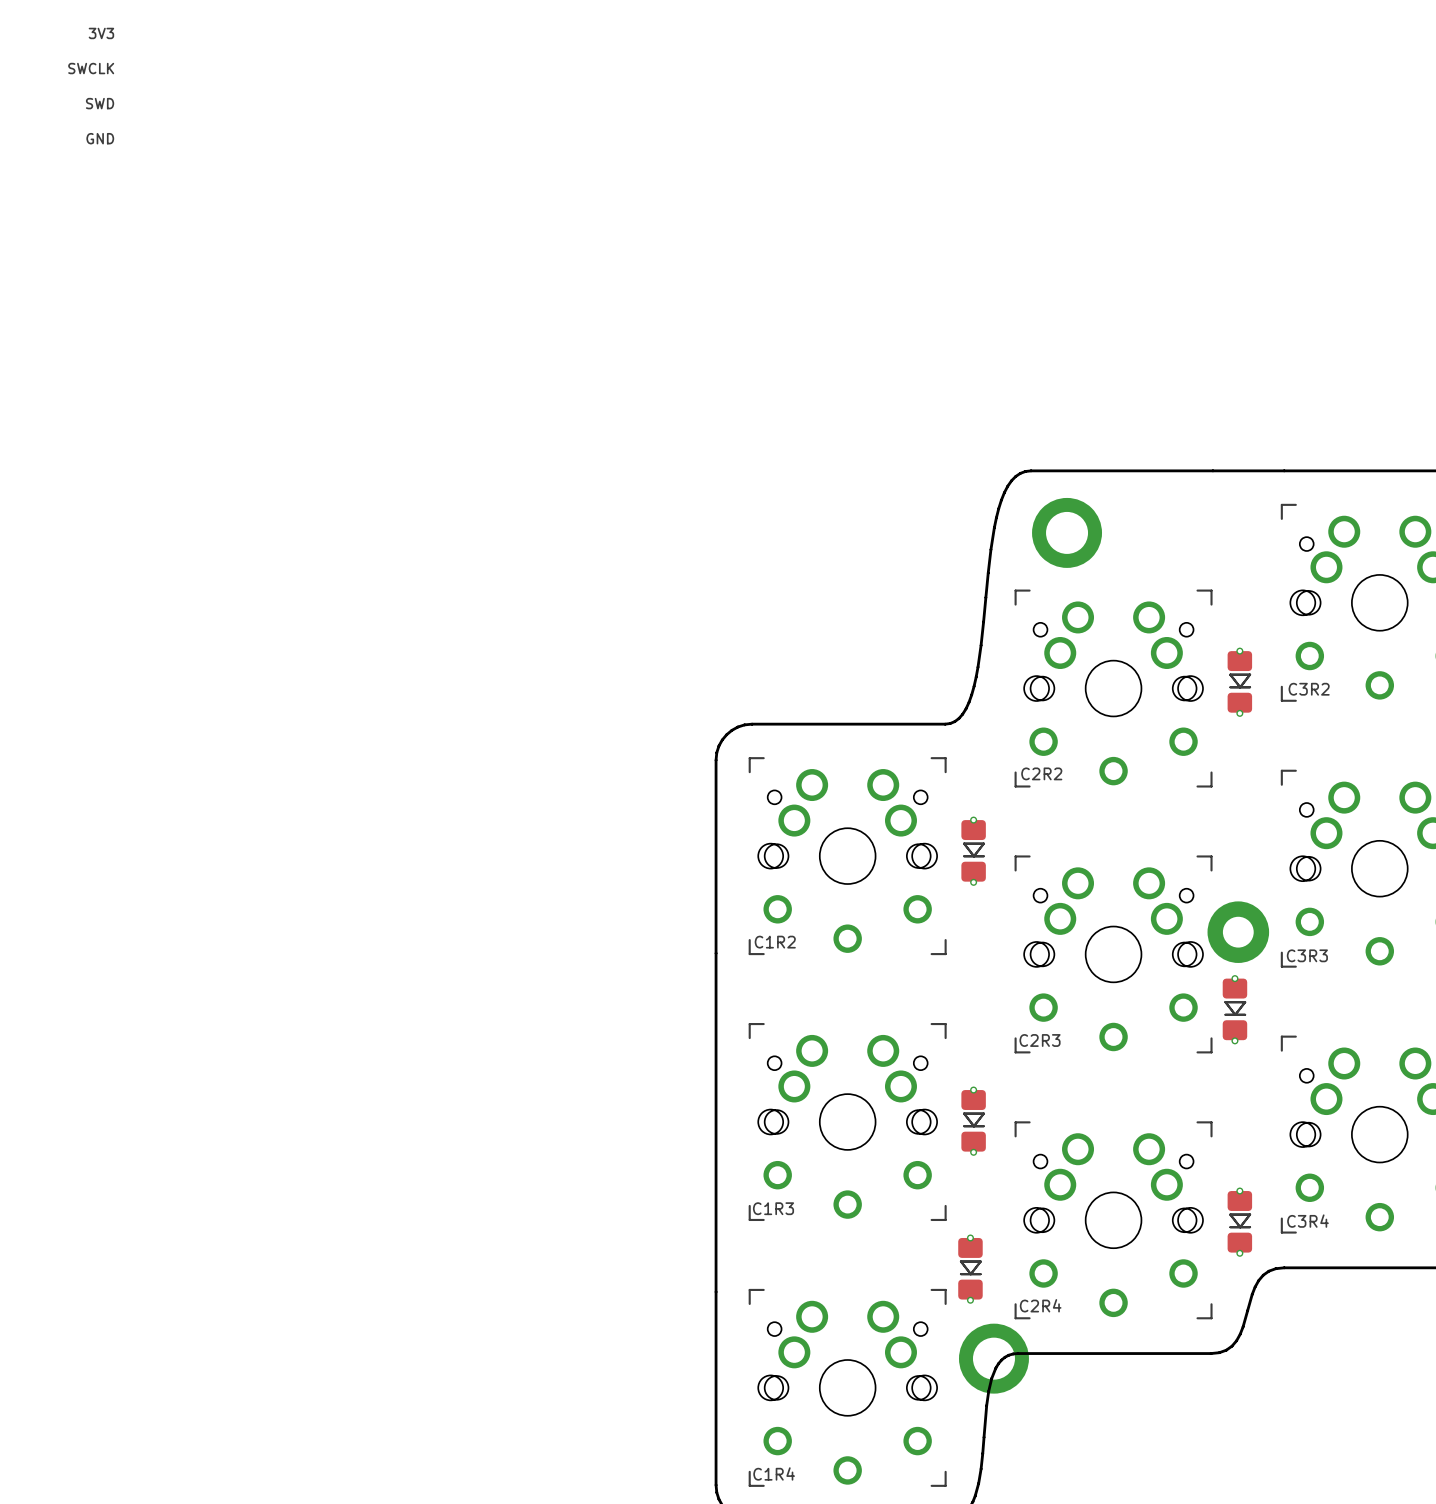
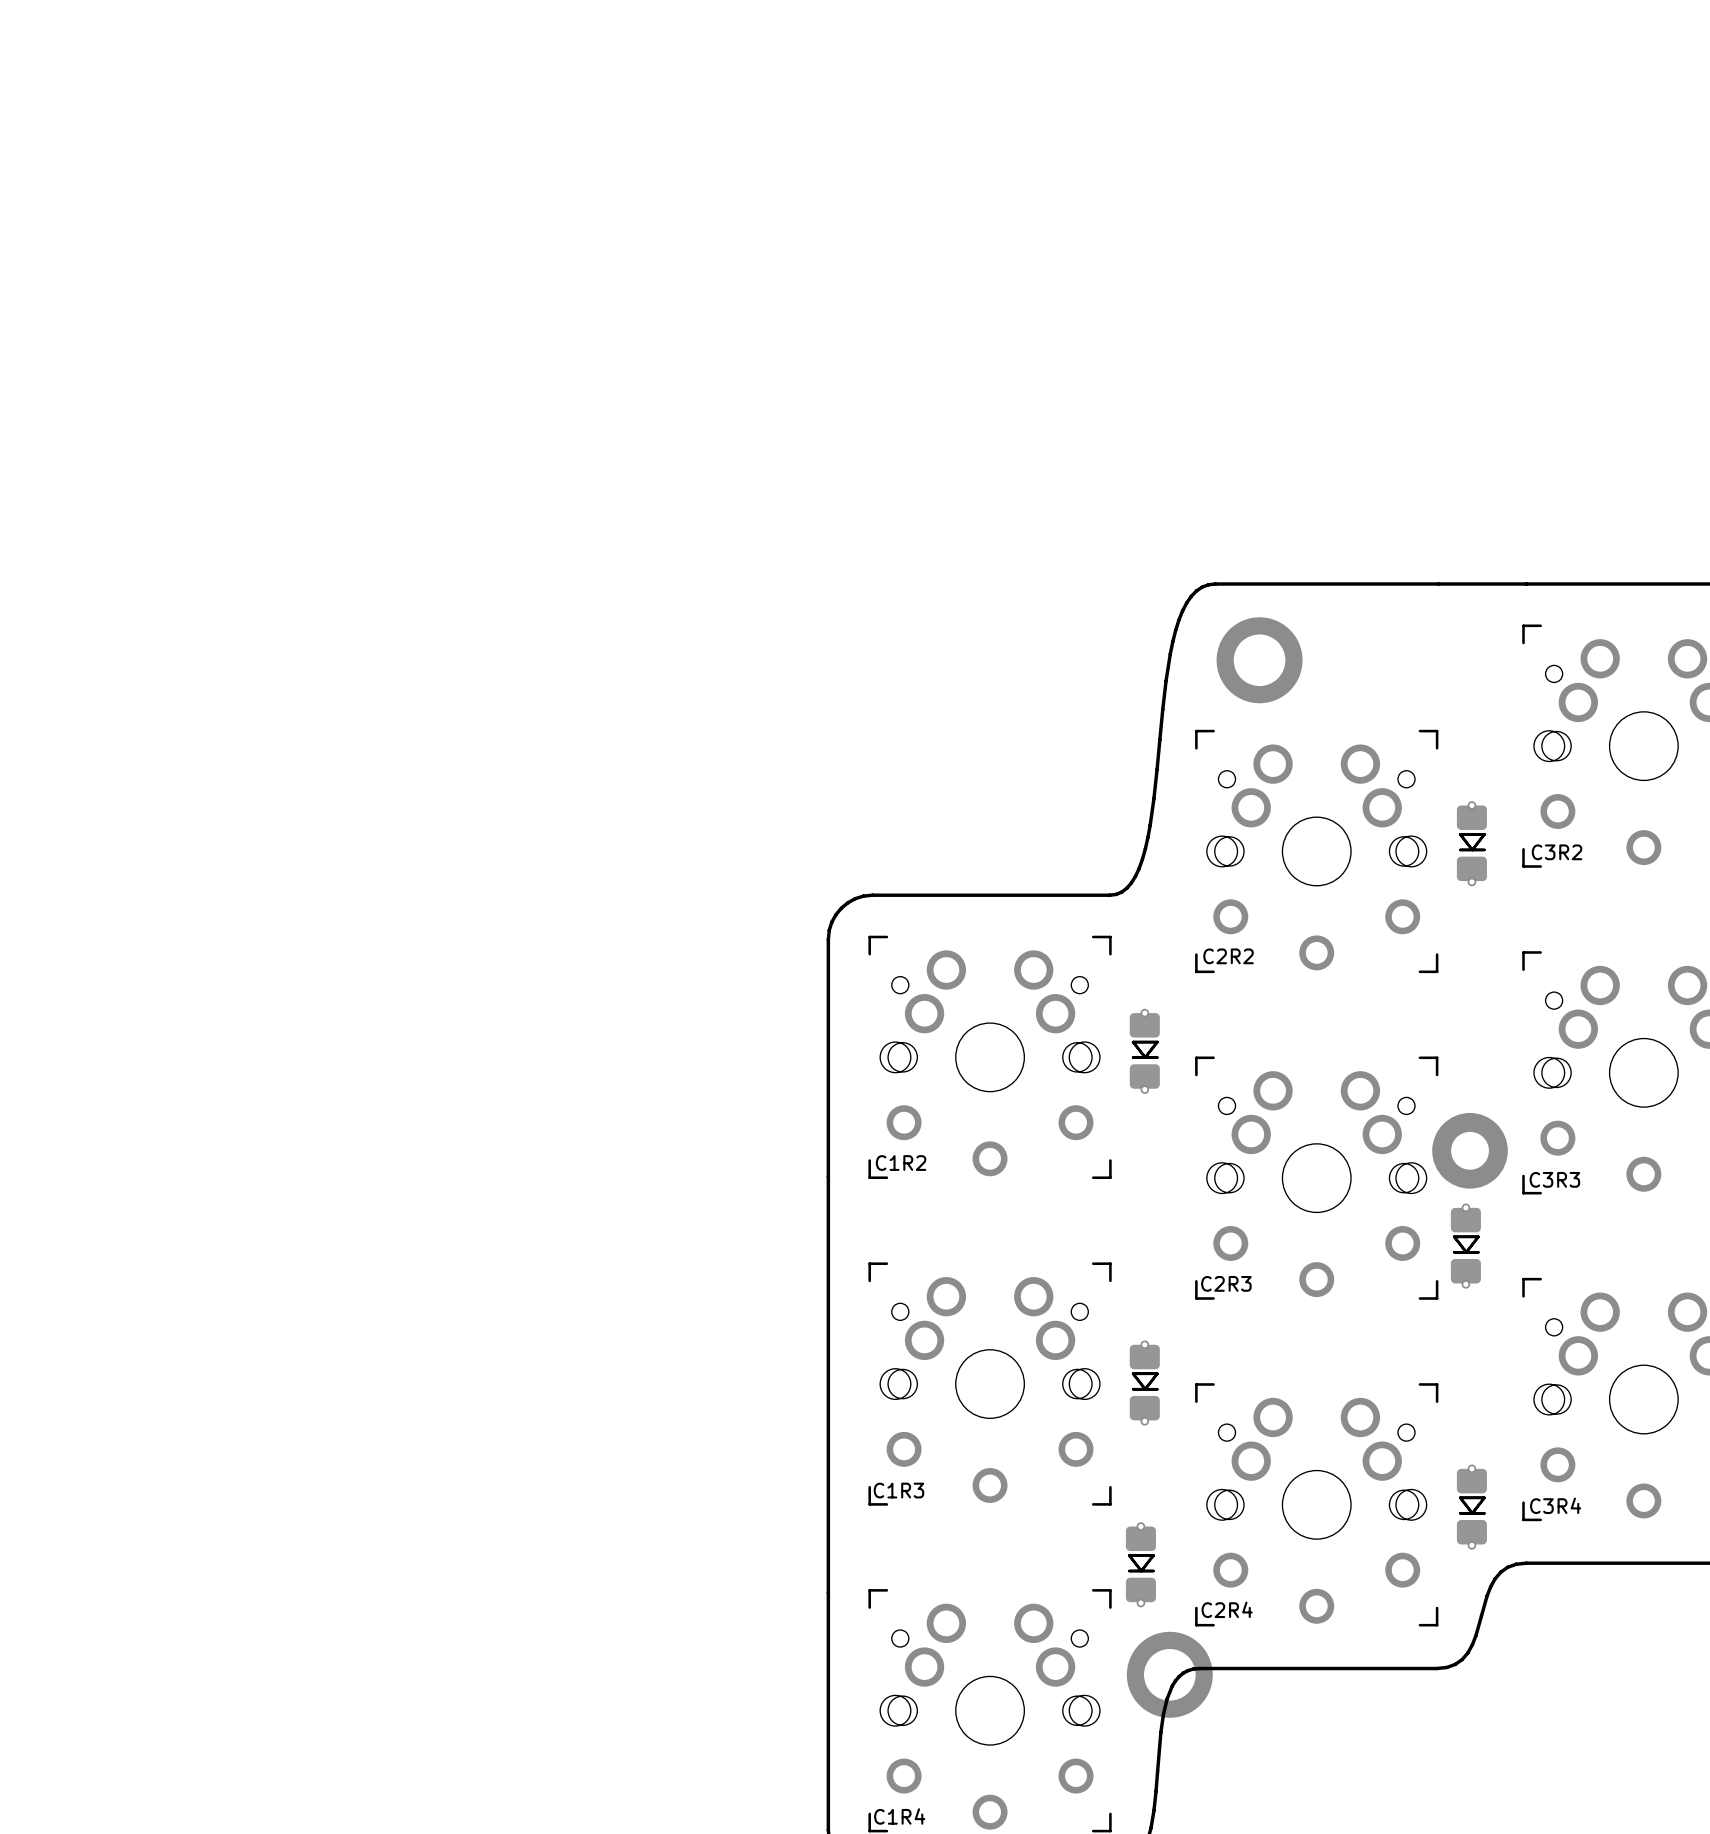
text: 3V3 (101, 33) -> none
text: SWCLK (91, 68) -> none
text: SWD (100, 103) -> none
text: GND (100, 138) -> none

